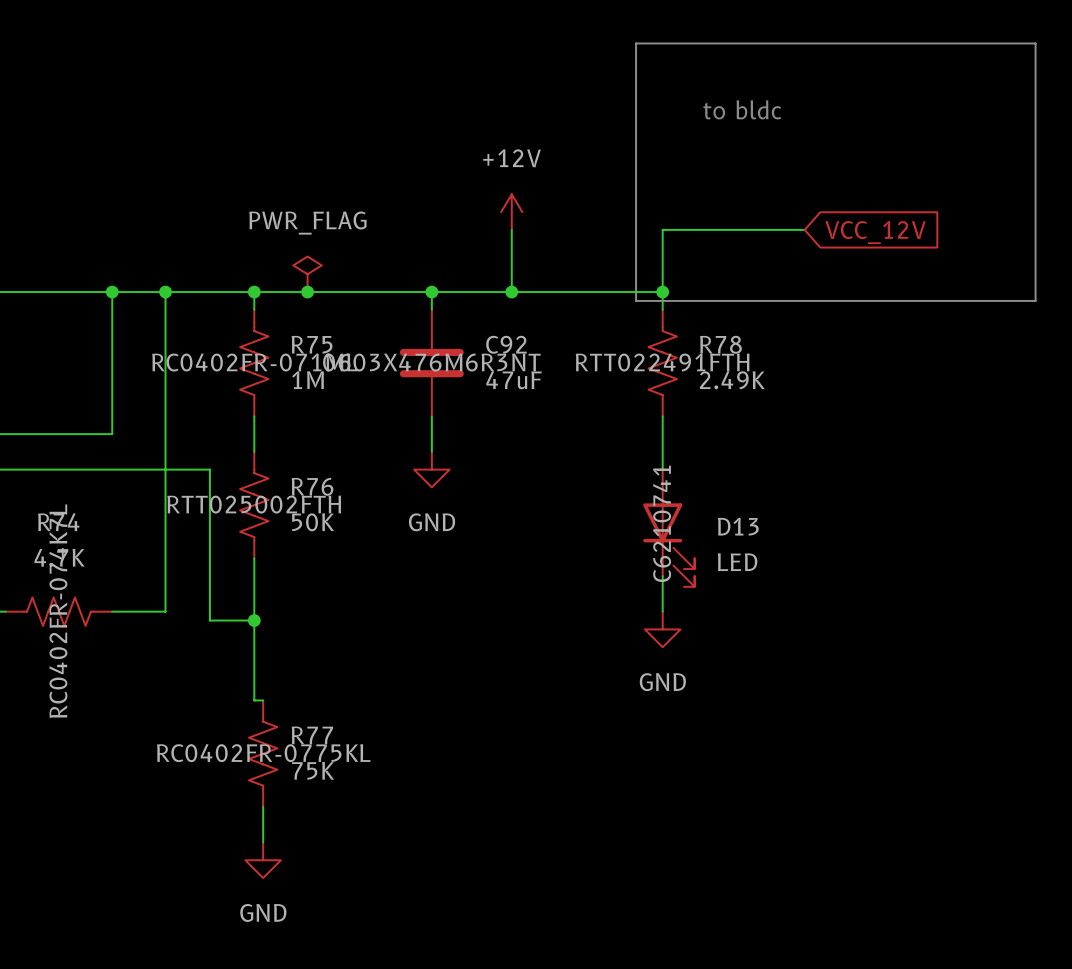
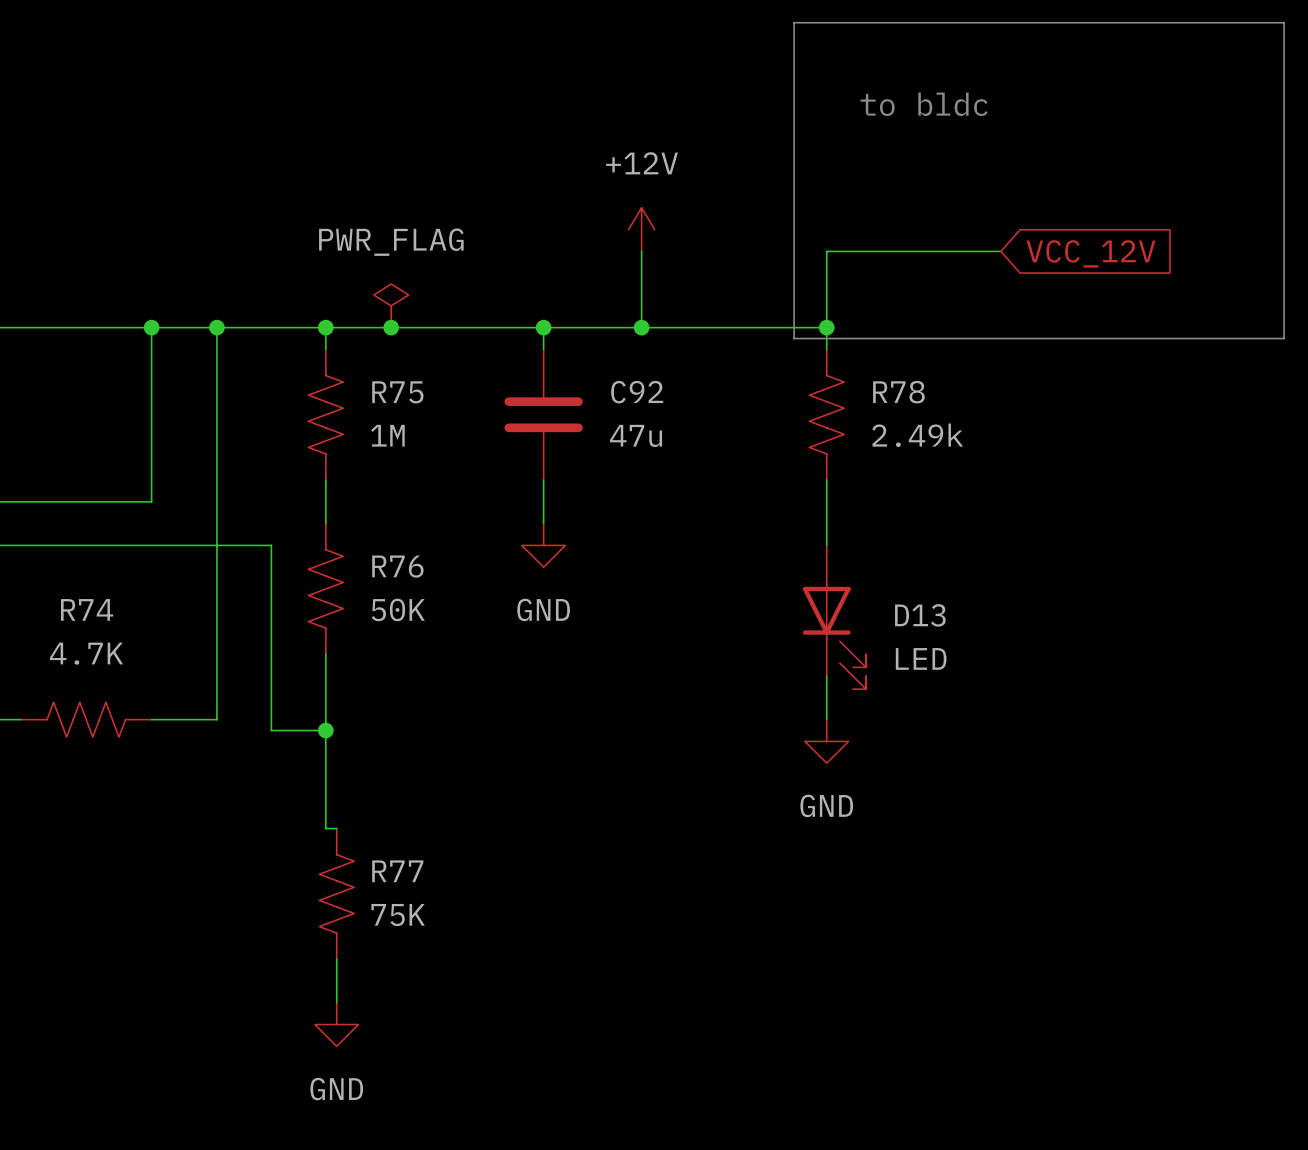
R75 text: RC0402FR-071ML (254, 362) -> none
C92 text: 0603X476M6R3NT (431, 362) -> none
R78 text: RTT022491FTH (662, 362) -> none
C92 value: 47uF (514, 380) -> 47u (636, 435)
R78 value: 2.49K (732, 380) -> 2.49k (917, 435)
R76 text: RTT025002FTH (254, 504) -> none
D13 text: C6210741 (662, 523) -> none
R74 text: RC0402FR-074K7L (58, 611) -> none
R77 text: RC0402FR-0775KL (263, 753) -> none

